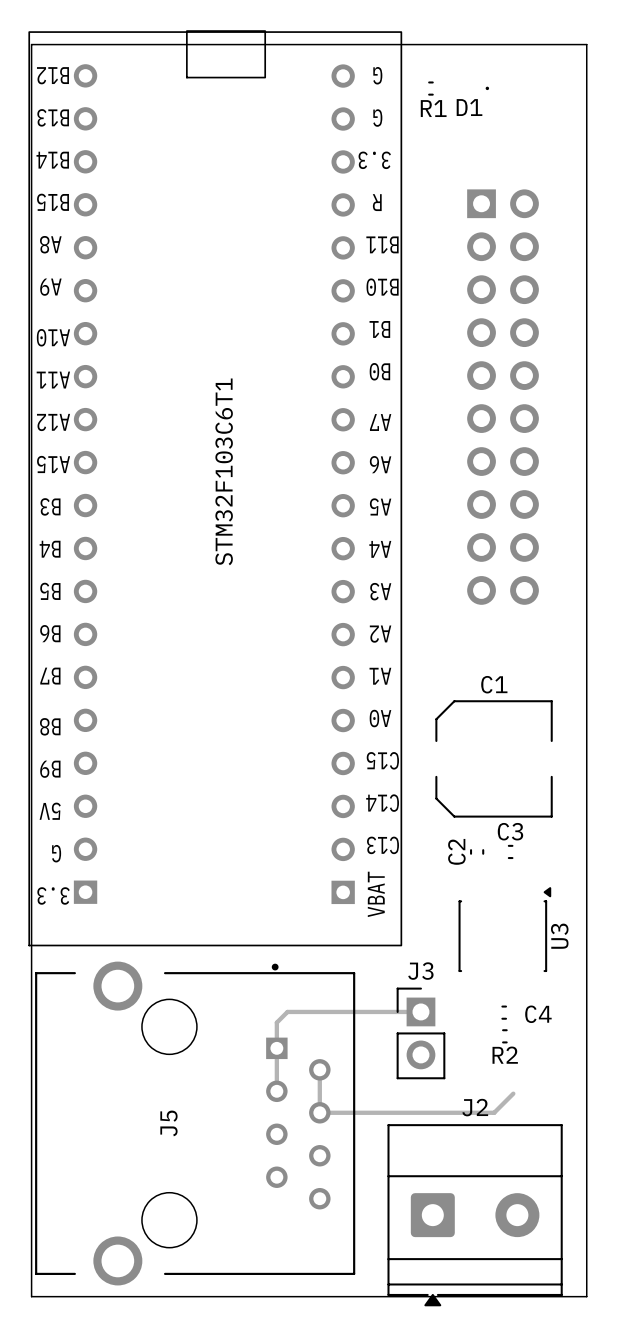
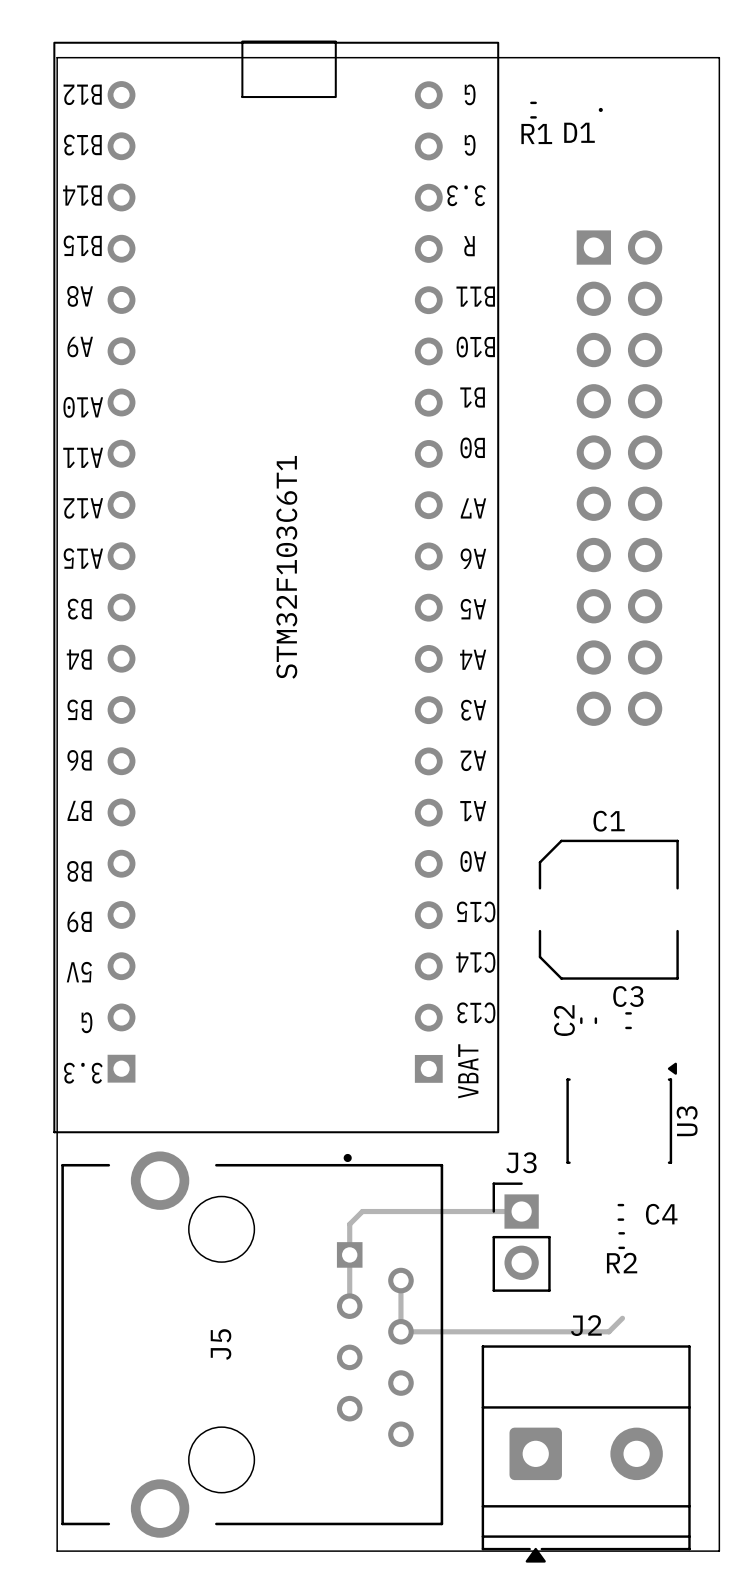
track: (513, 1093) (505, 1101) -> none

